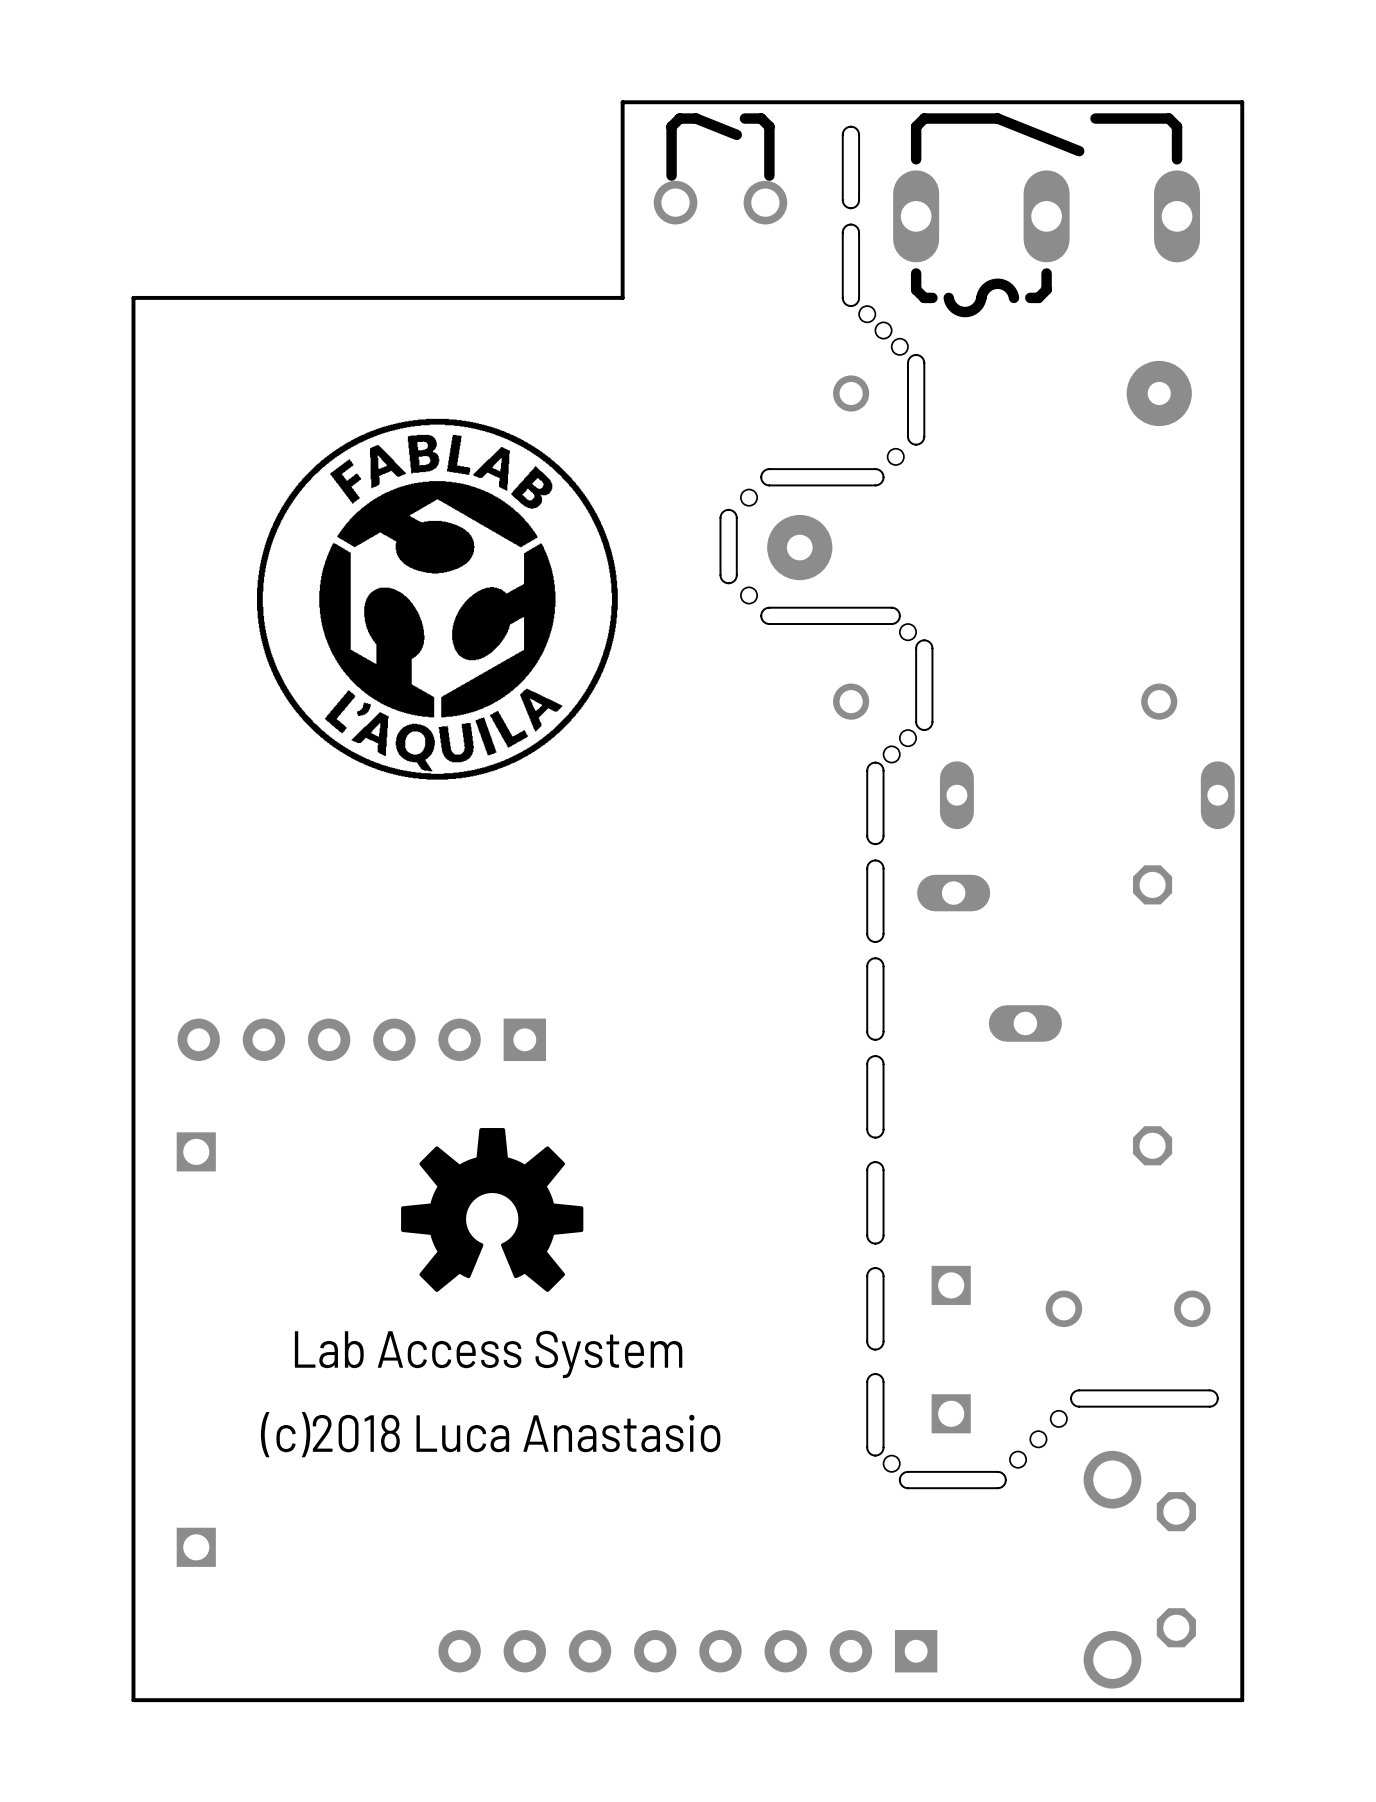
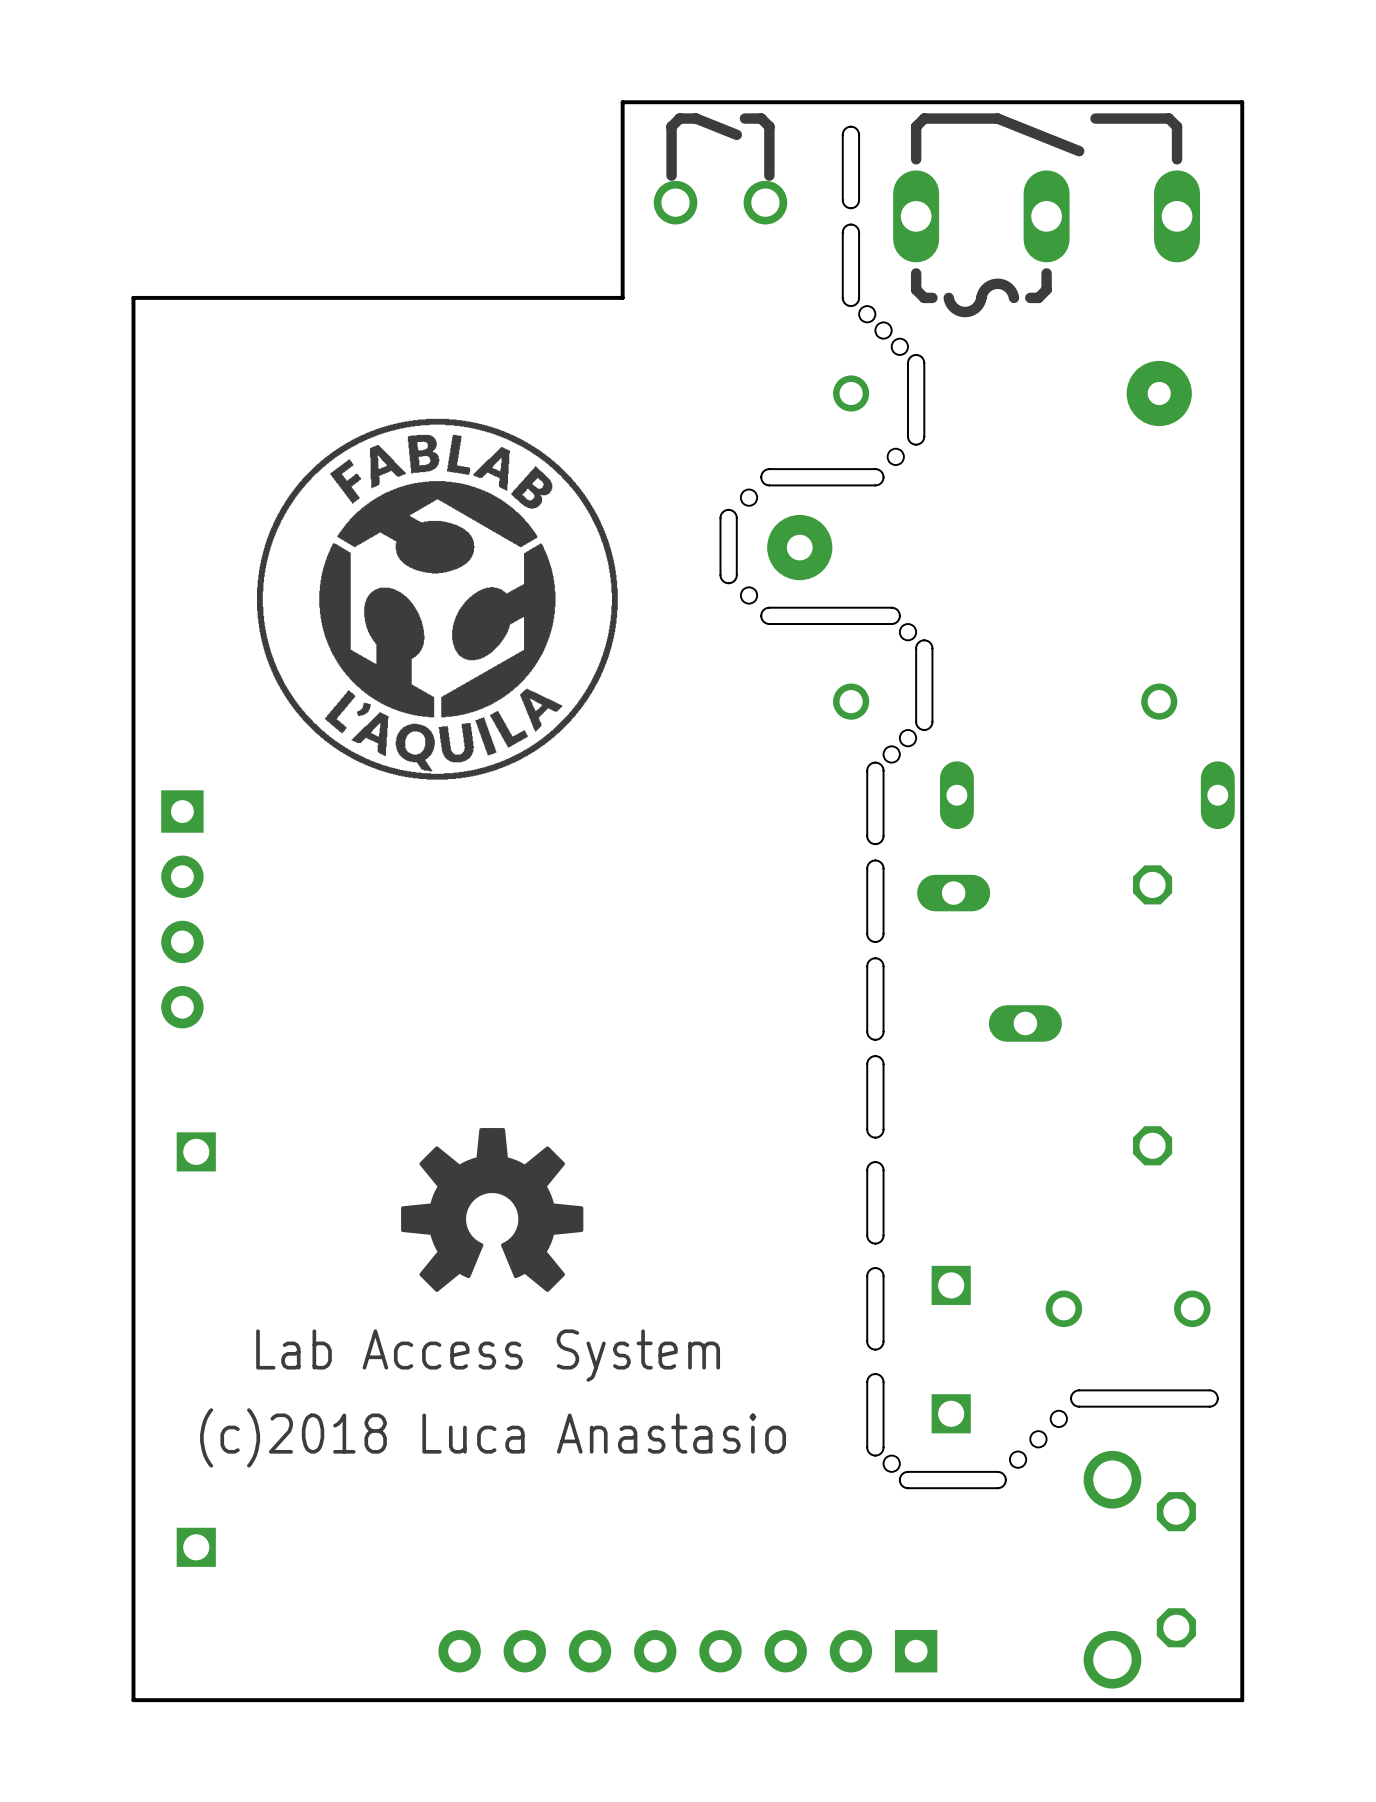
part: none -> (182, 909)
part: (361, 1039) -> none

